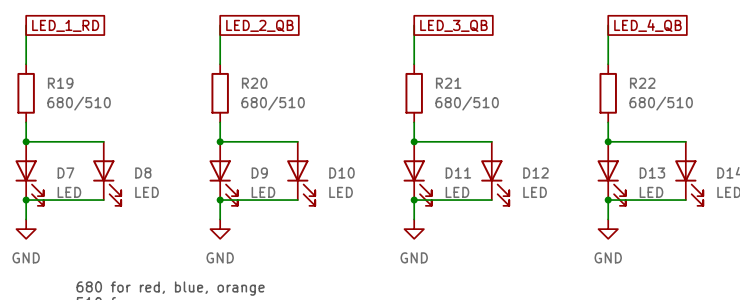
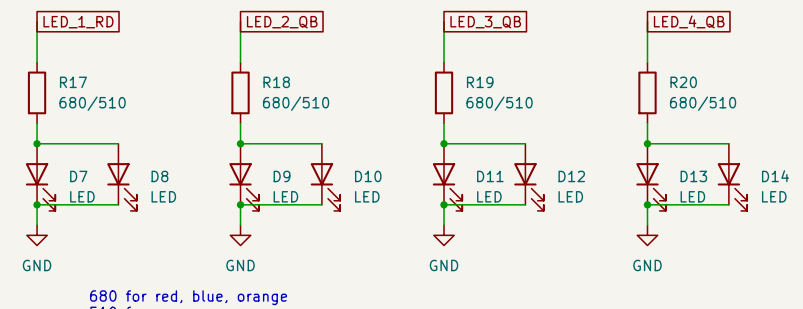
R19 name: R19 (60, 83) -> R17 (73, 82)
R20 name: R20 (254, 83) -> R18 (276, 82)
R21 name: R21 (448, 83) -> R19 (480, 82)
R22 name: R22 (642, 83) -> R20 (683, 82)

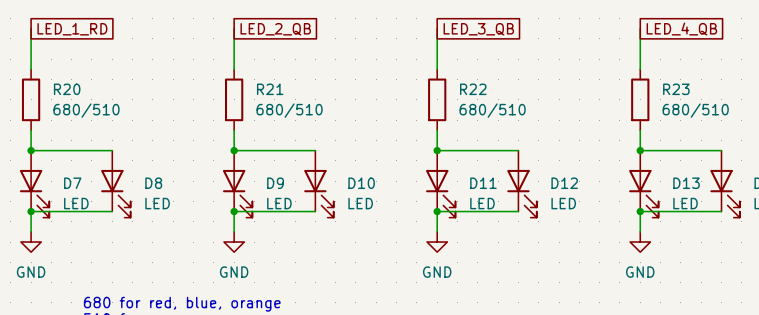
R17 name: R17 (73, 82) -> R20 (67, 89)
R18 name: R18 (276, 82) -> R21 (270, 89)
R19 name: R19 (480, 82) -> R22 (473, 89)
R20 name: R20 (683, 82) -> R23 (676, 89)

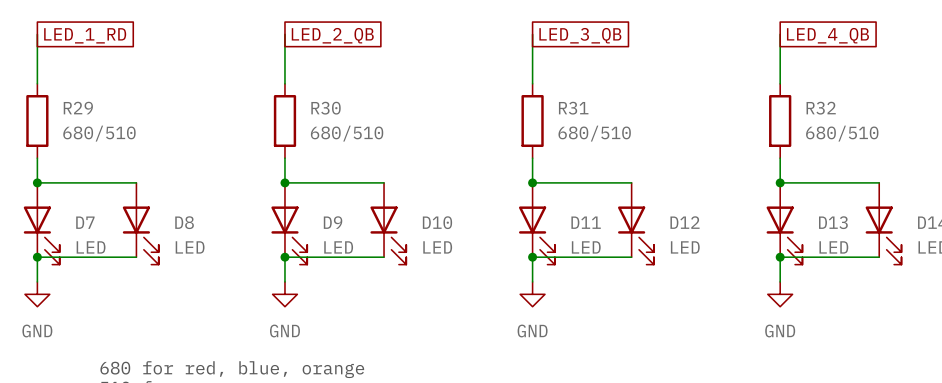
R20 name: R20 (67, 89) -> R29 (78, 108)
R21 name: R21 (270, 89) -> R30 (326, 108)
R22 name: R22 (473, 89) -> R31 (573, 108)
R23 name: R23 (676, 89) -> R32 (821, 108)

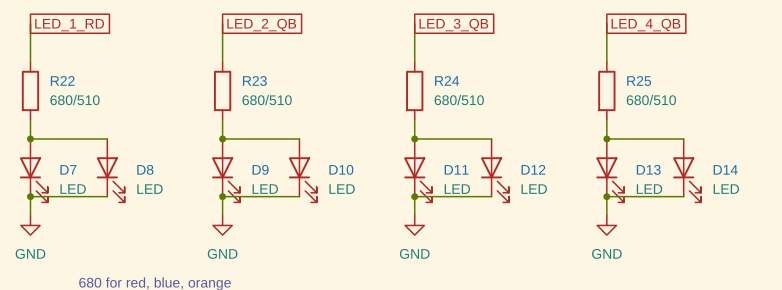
R29 name: R29 (78, 108) -> R22 (62, 80)
R30 name: R30 (326, 108) -> R23 (254, 81)
R31 name: R31 (573, 108) -> R24 (447, 80)
R32 name: R32 (821, 108) -> R25 (639, 81)

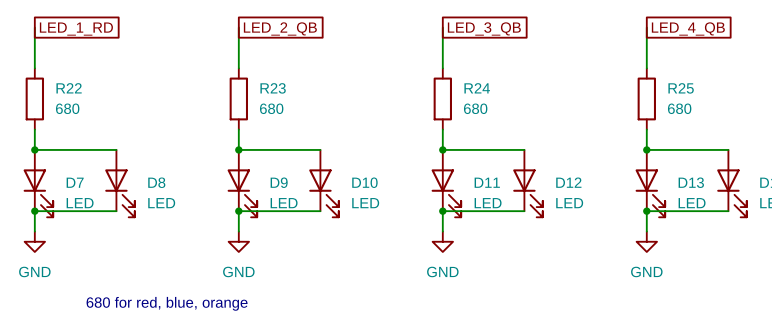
R22 value: 680/510 (75, 100) -> 680 (67, 108)
R23 value: 680/510 (267, 100) -> 680 (271, 108)
R24 value: 680/510 (459, 100) -> 680 (475, 108)
R25 value: 680/510 (651, 100) -> 680 (679, 108)

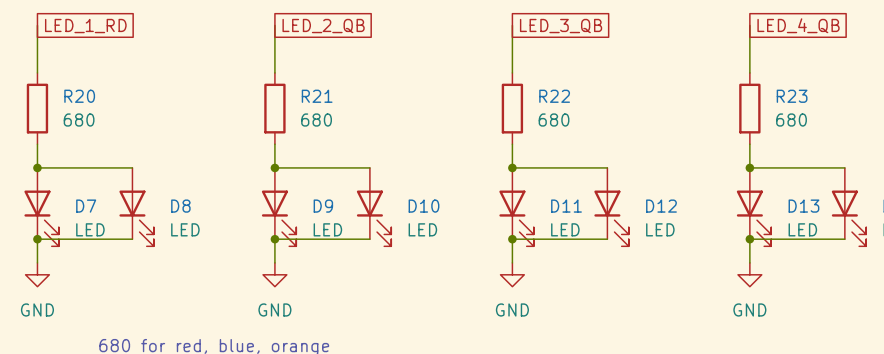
R22 name: R22 (69, 88) -> R20 (79, 96)
R23 name: R23 (273, 88) -> R21 (317, 96)
R24 name: R24 (477, 88) -> R22 (554, 96)
R25 name: R25 (681, 88) -> R23 (792, 96)

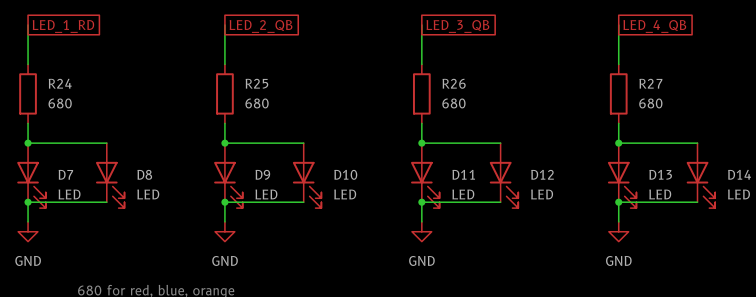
R20 name: R20 (79, 96) -> R24 (60, 83)
R21 name: R21 (317, 96) -> R25 (256, 83)
R22 name: R22 (554, 96) -> R26 (454, 83)
R23 name: R23 (792, 96) -> R27 (650, 83)

